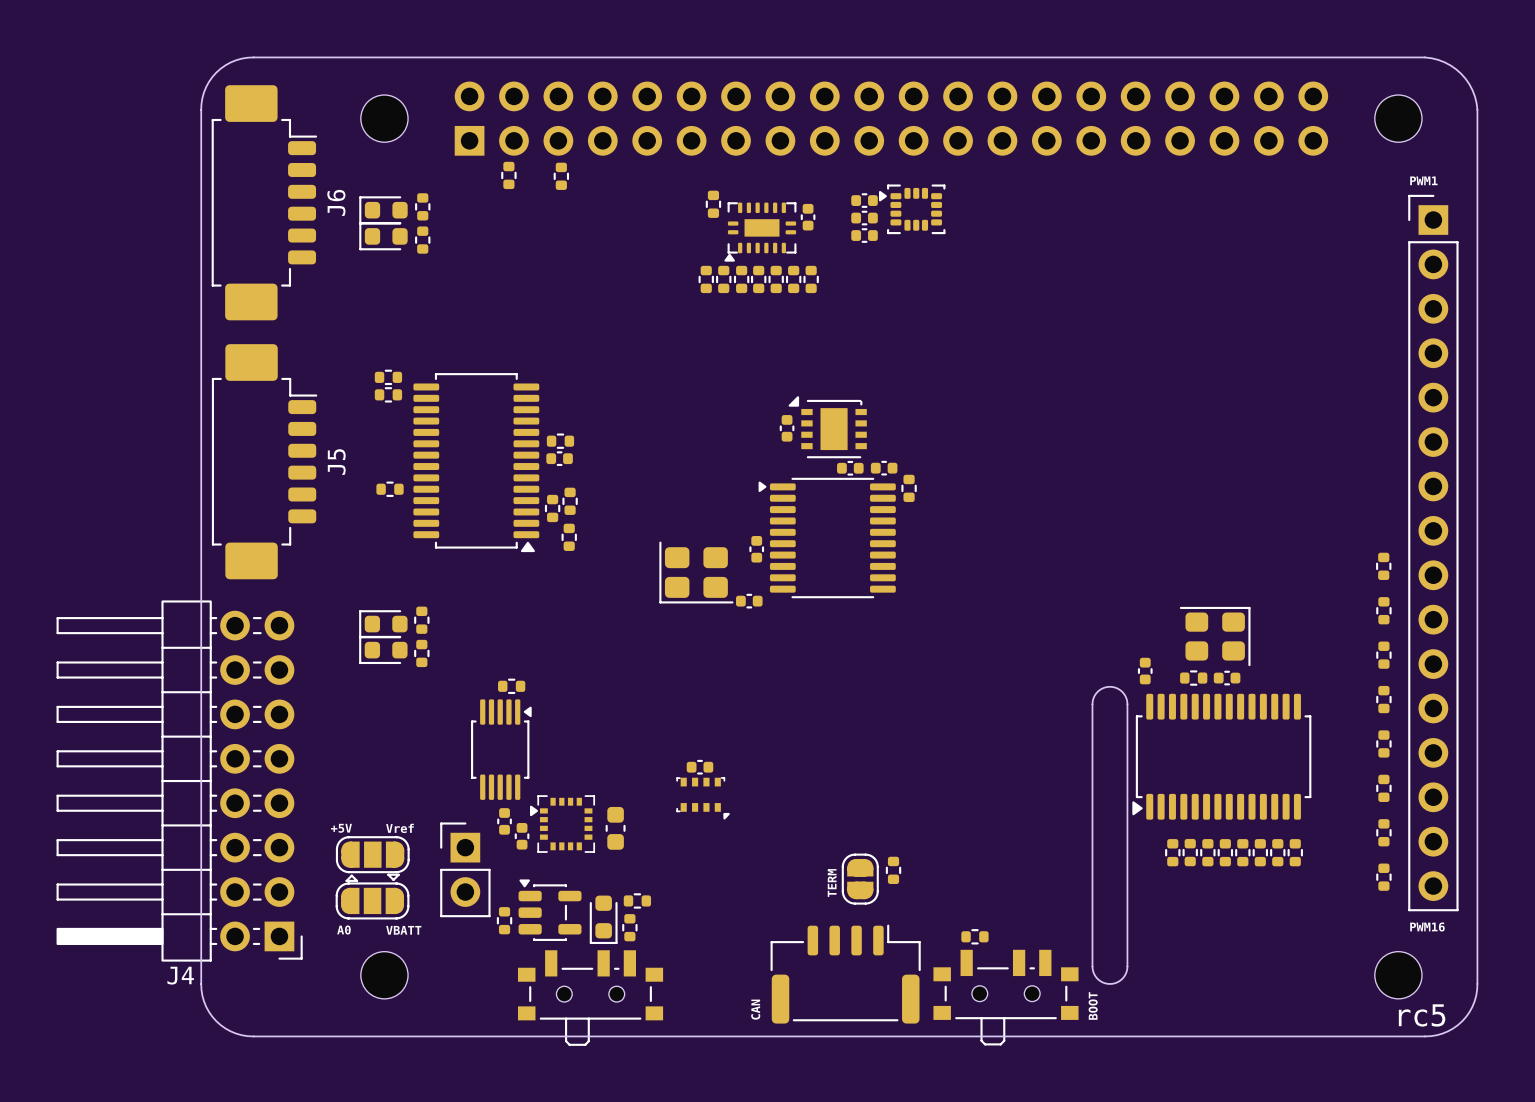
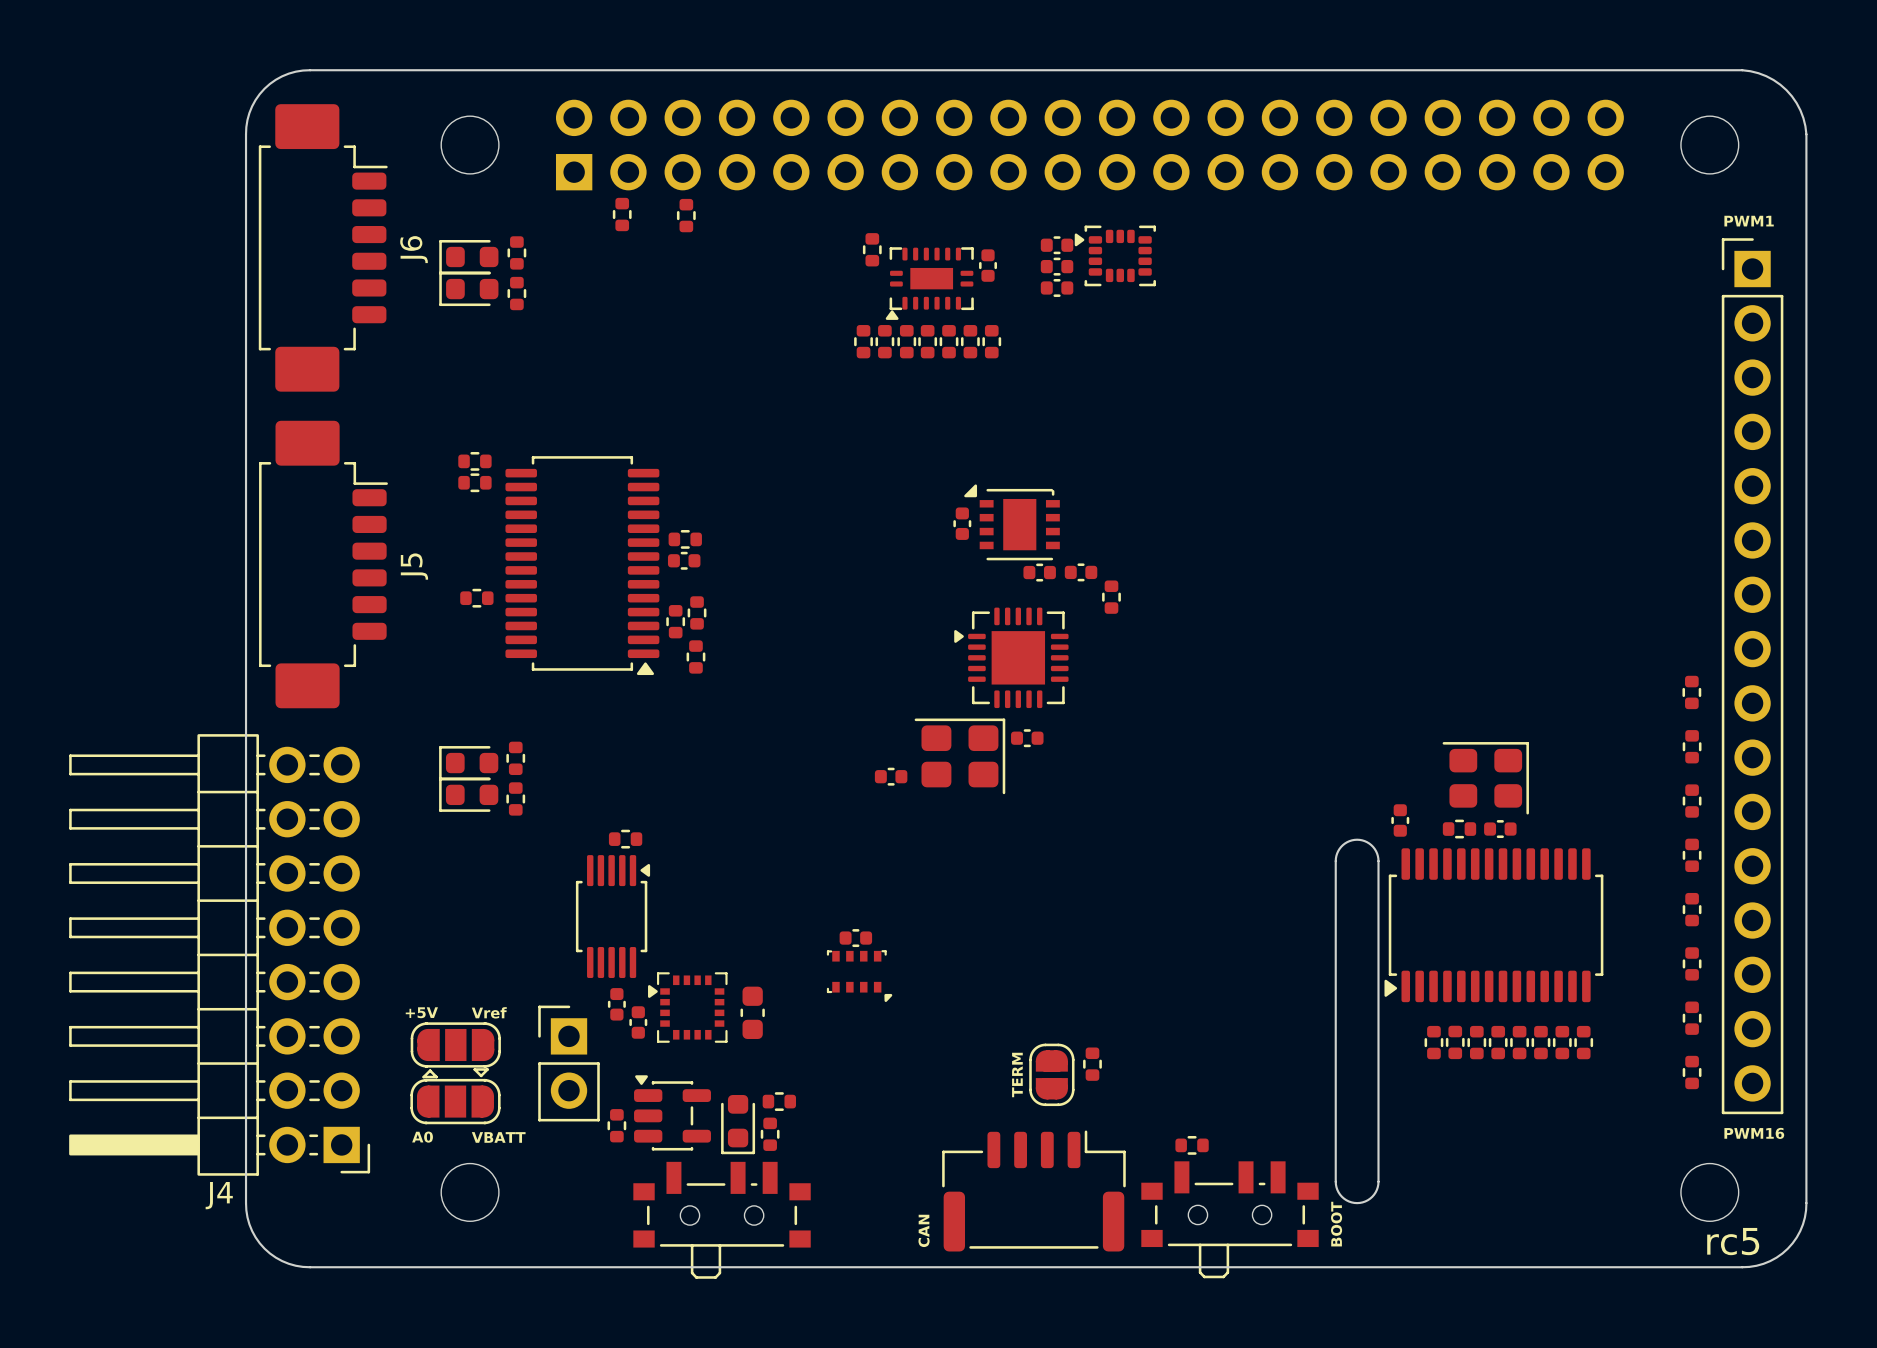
part footprint: [758, 477, 896, 599] -> [954, 607, 1069, 709]
part: (756, 549) -> none
part rotation: 0° (696, 572) -> 180° (959, 756)
part position: (696, 572) -> (959, 756)
part position: (749, 601) -> (891, 776)
part: none -> (1027, 738)

